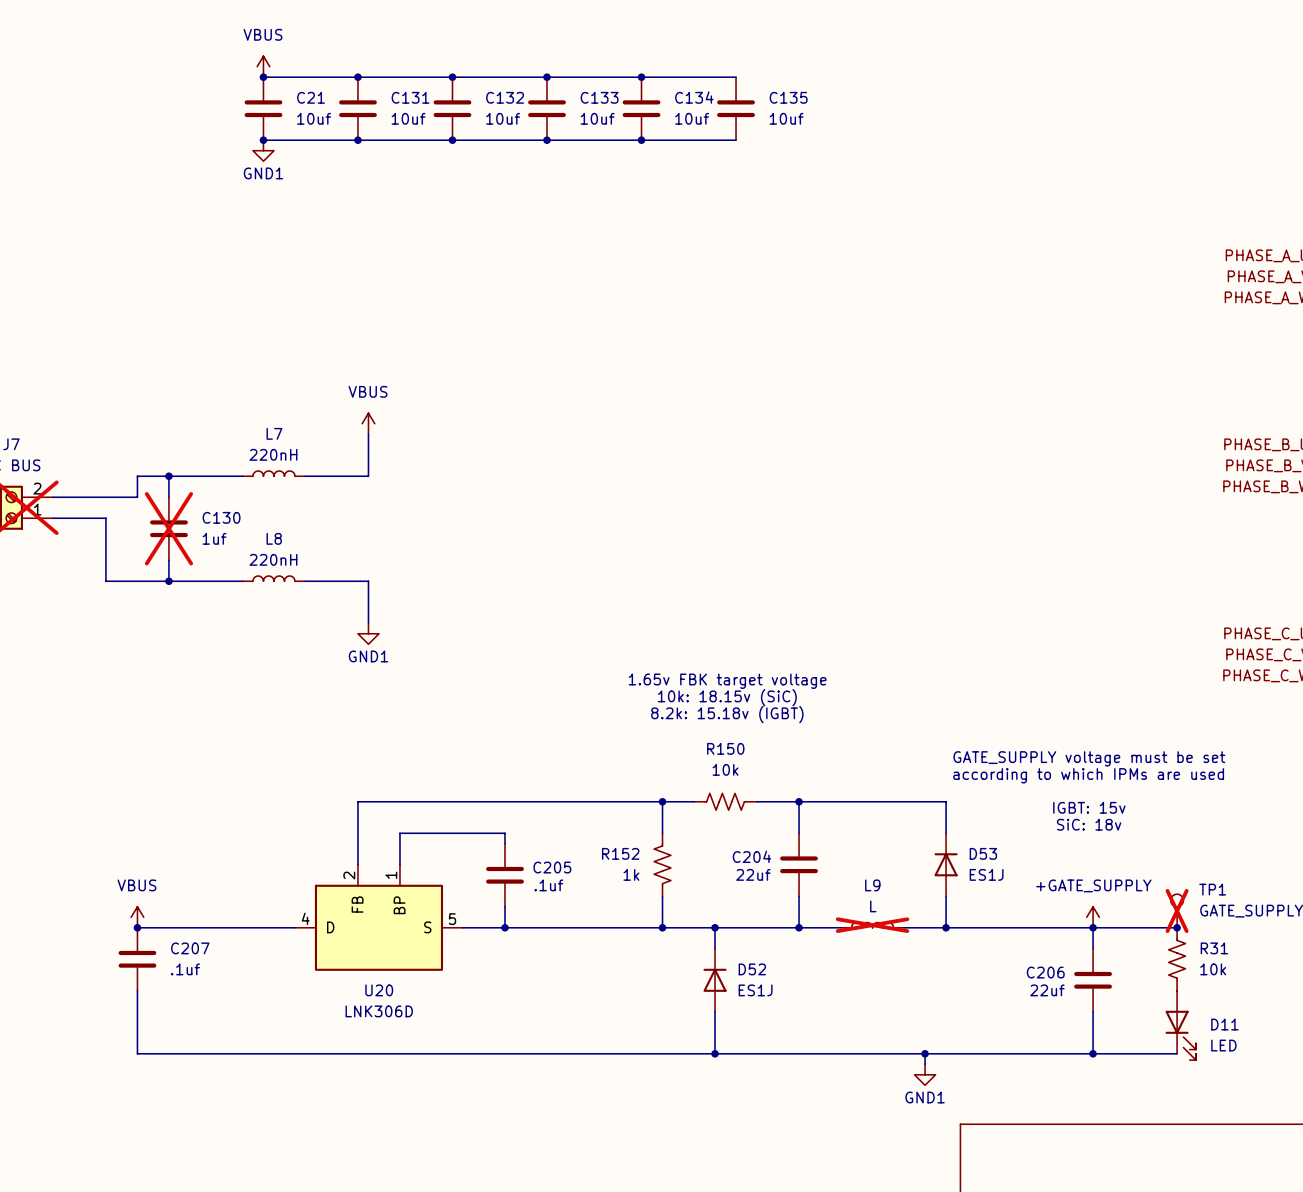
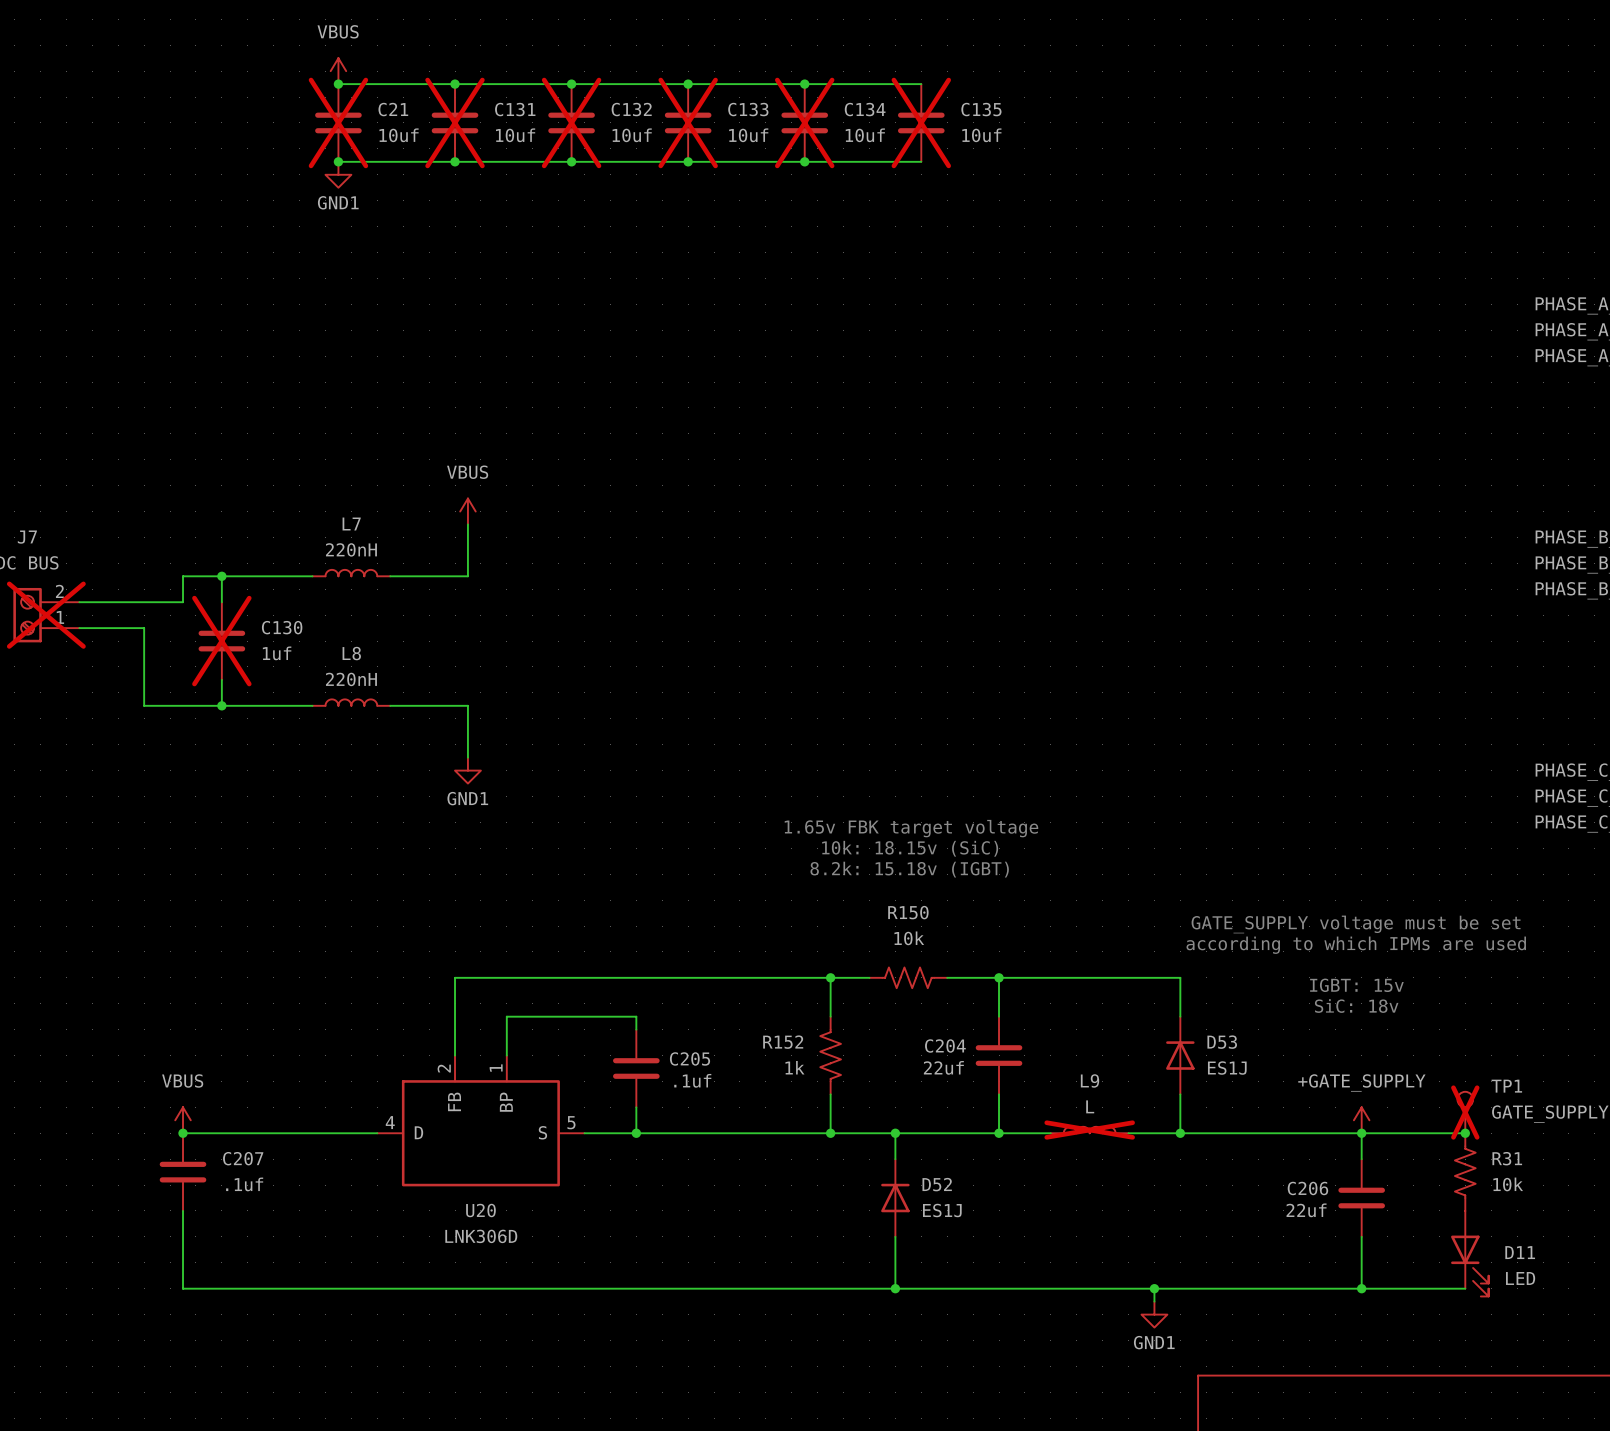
C21 do-not-place cross: none -> (338, 122)
C131 do-not-place cross: none -> (455, 122)
C132 do-not-place cross: none -> (571, 122)
C133 do-not-place cross: none -> (688, 122)
C134 do-not-place cross: none -> (804, 122)
C135 do-not-place cross: none -> (921, 122)

